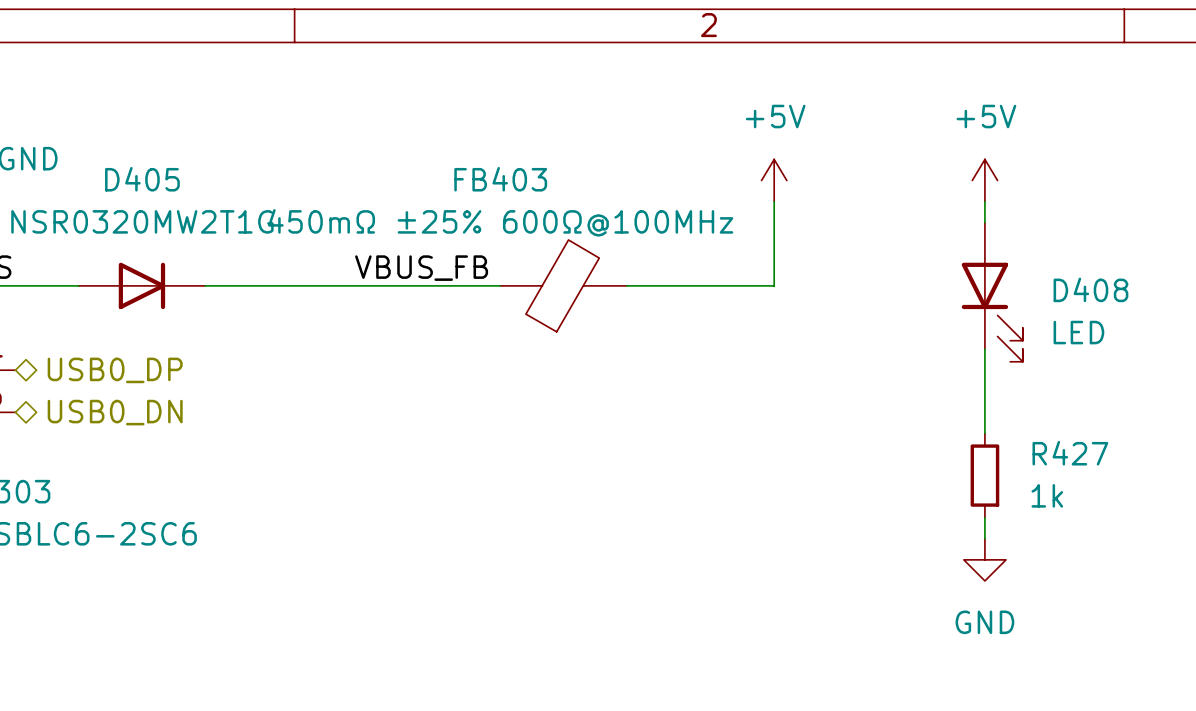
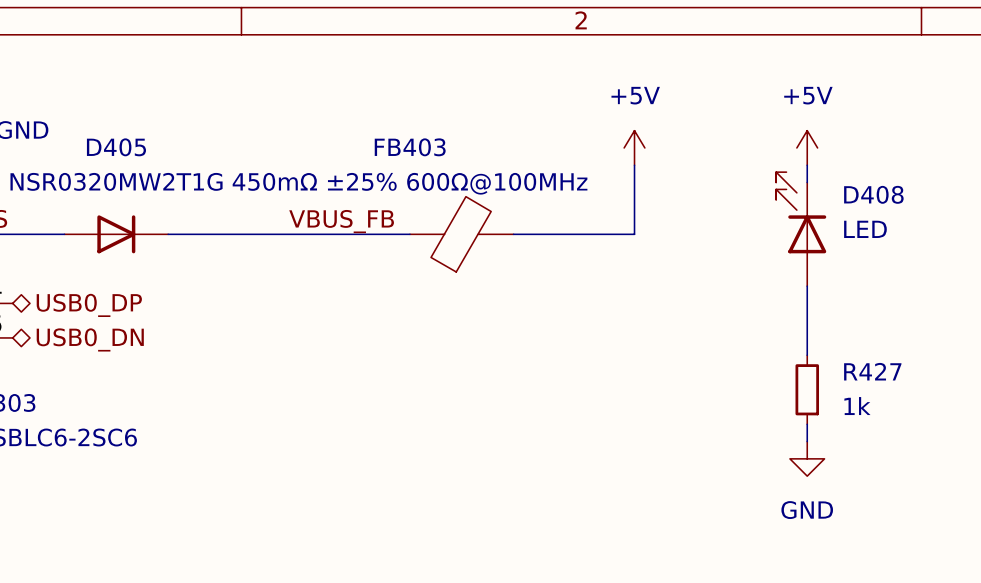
D408 name position: D408 (1090, 289) -> D408 (873, 194)
D408 rotation: 0° (992, 312) -> 180° (801, 212)
D408 value position: LED (1078, 332) -> LED (865, 229)

